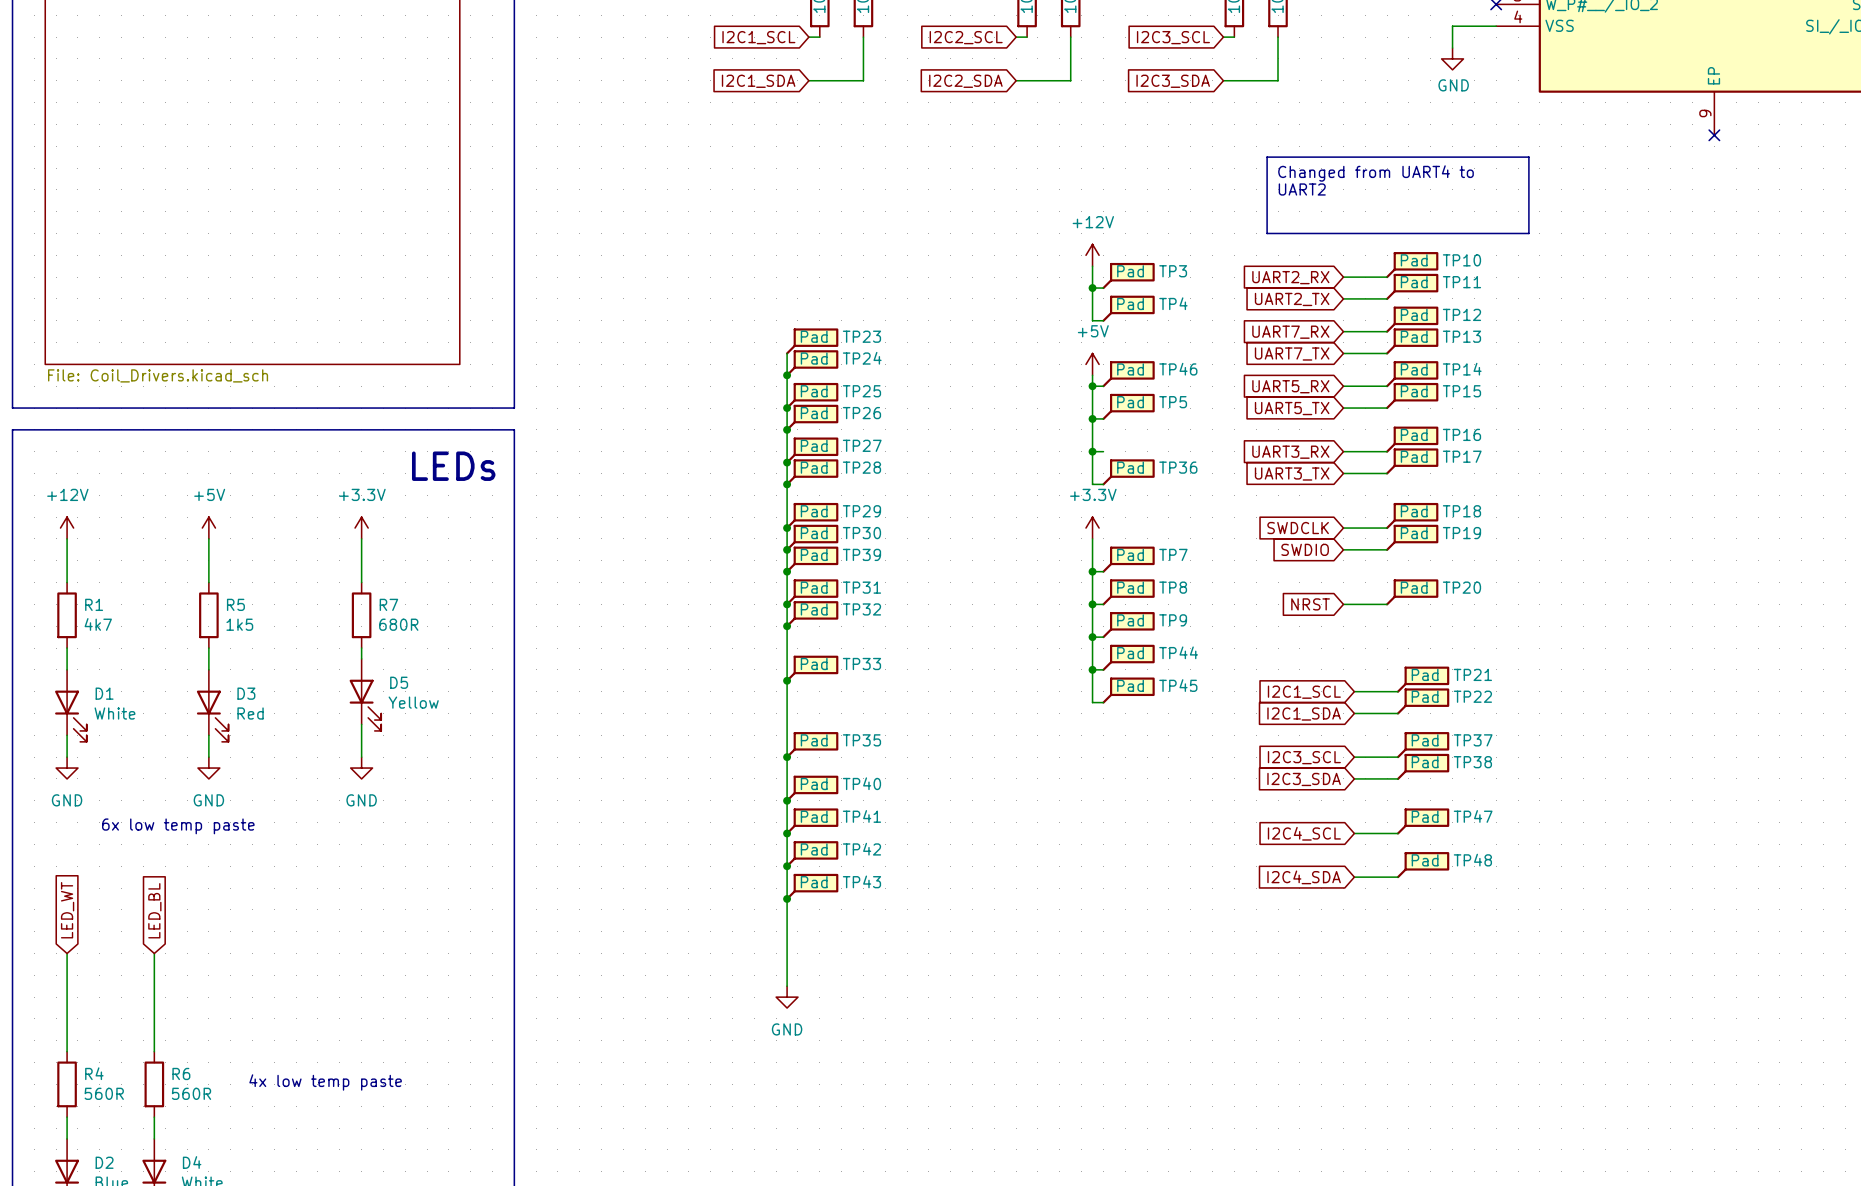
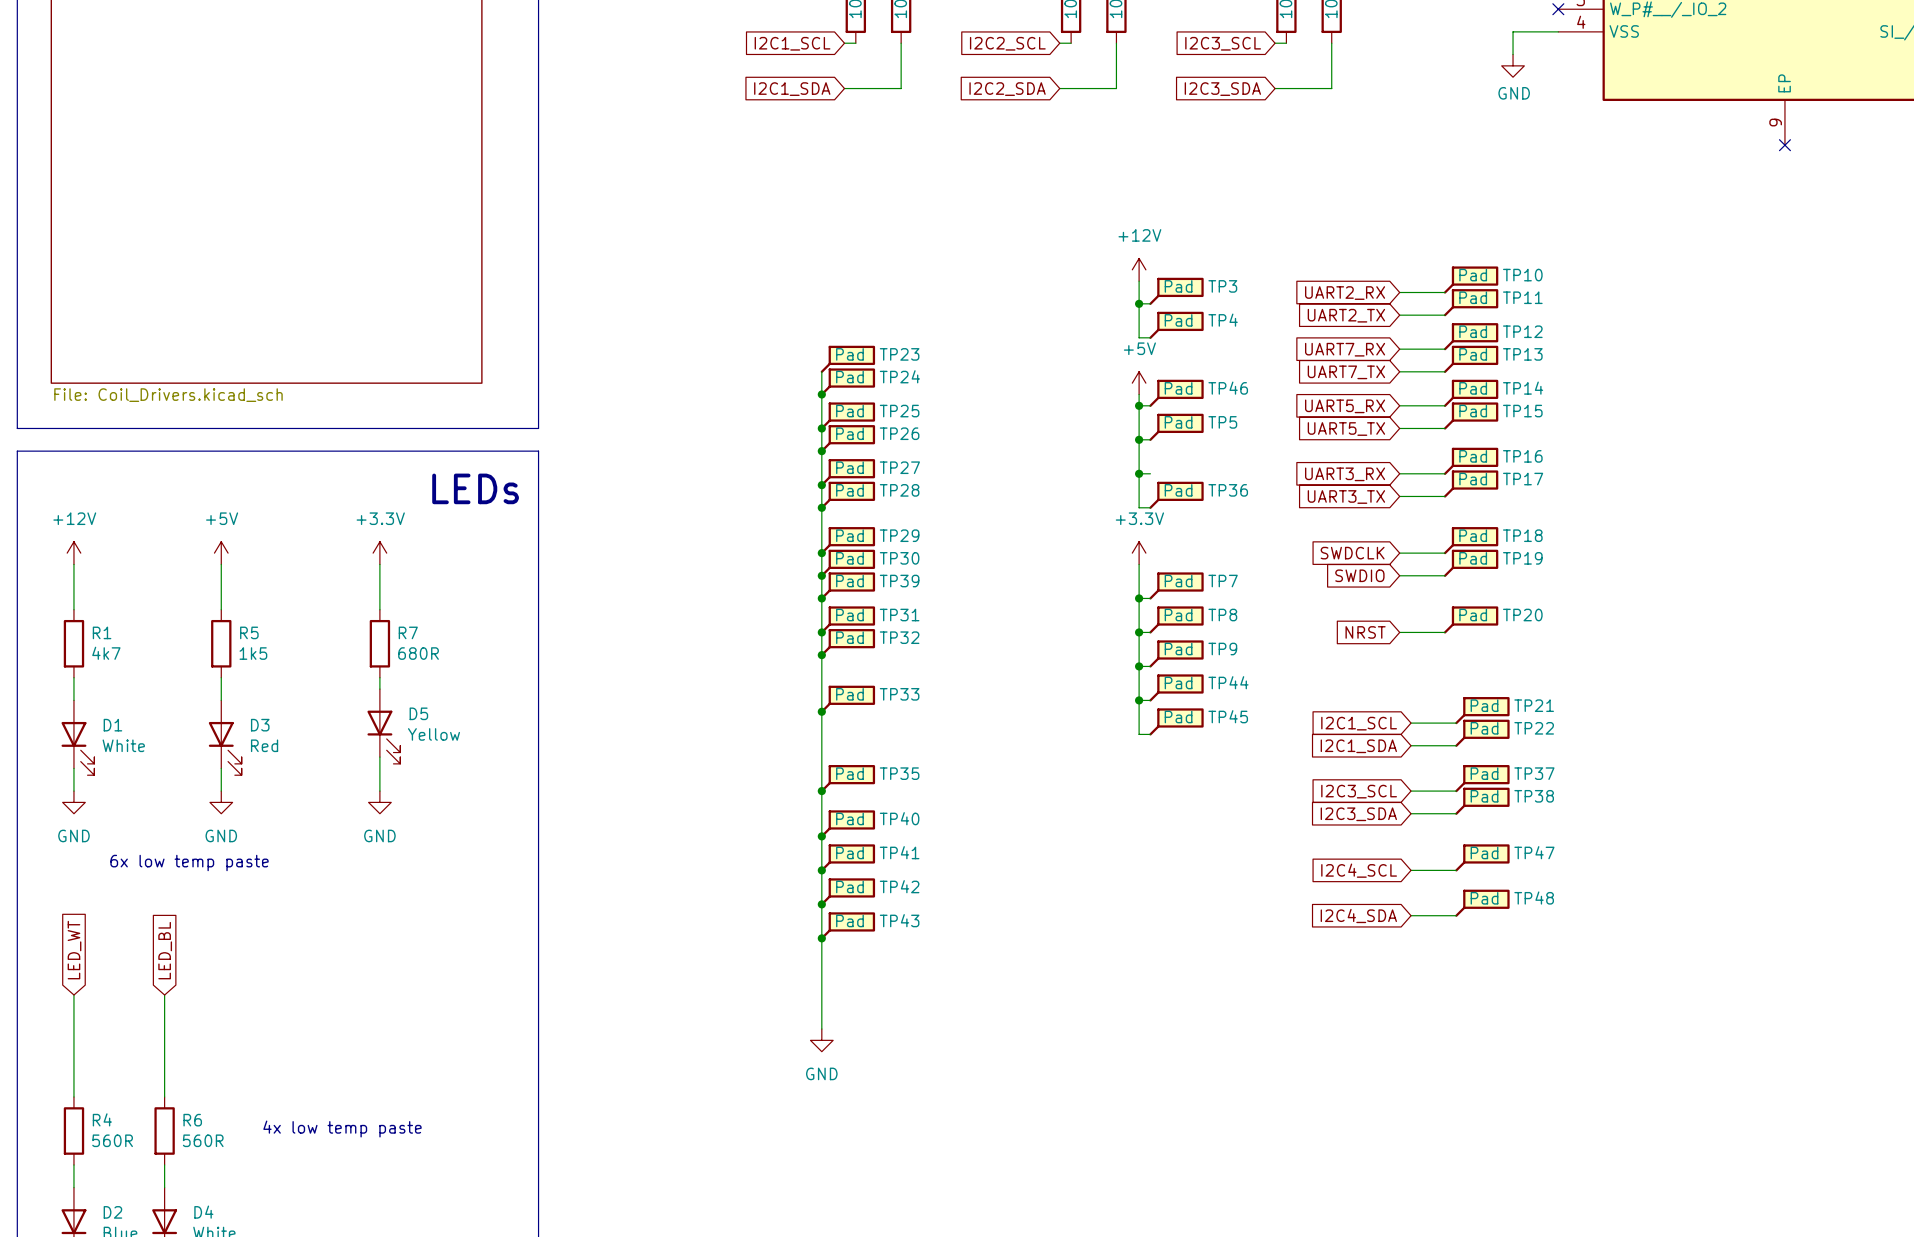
line: (1267, 157) (1528, 157) (1528, 233) (1267, 233) (1267, 157) -> none
text: Changed from UART4 to (1376, 173) -> none
text: UART2 (1302, 189) -> none

